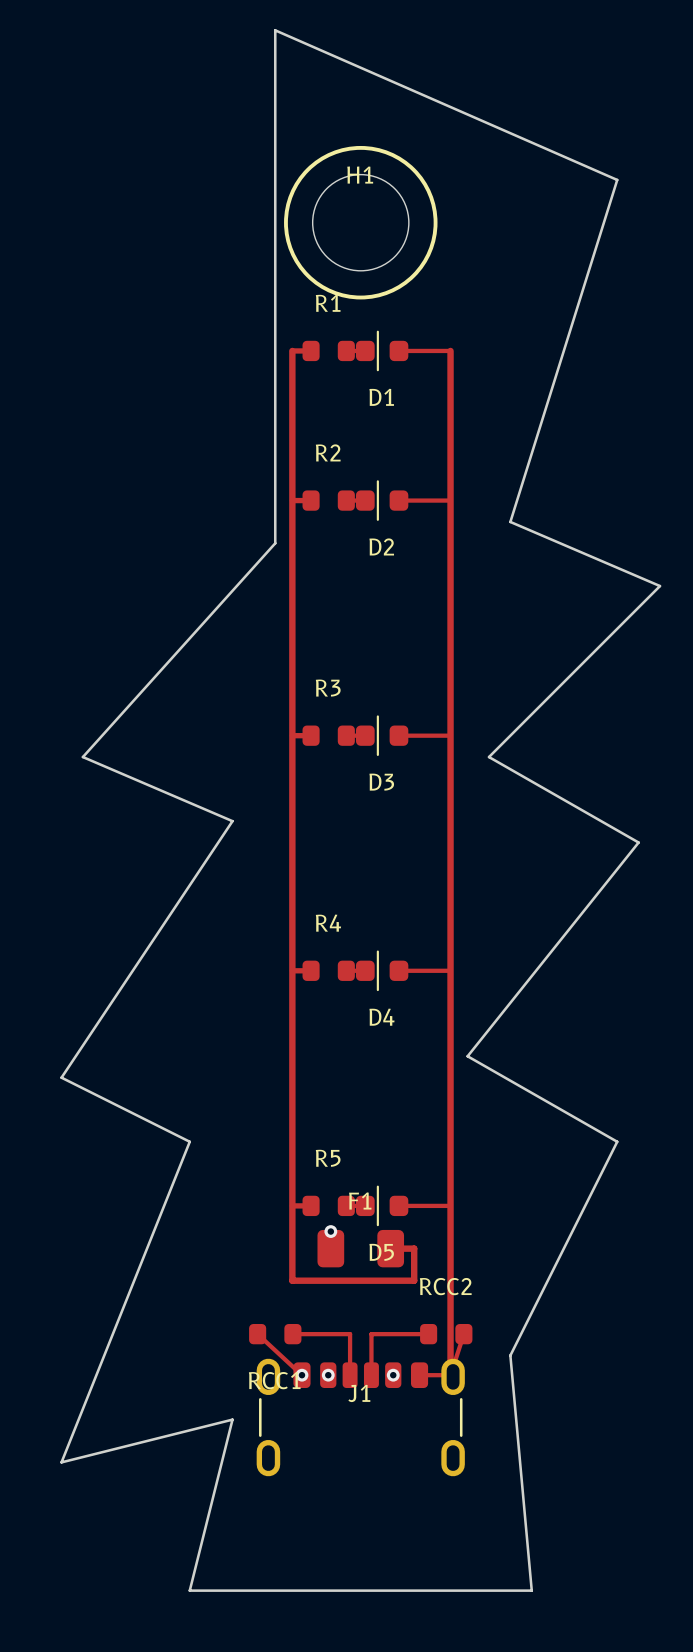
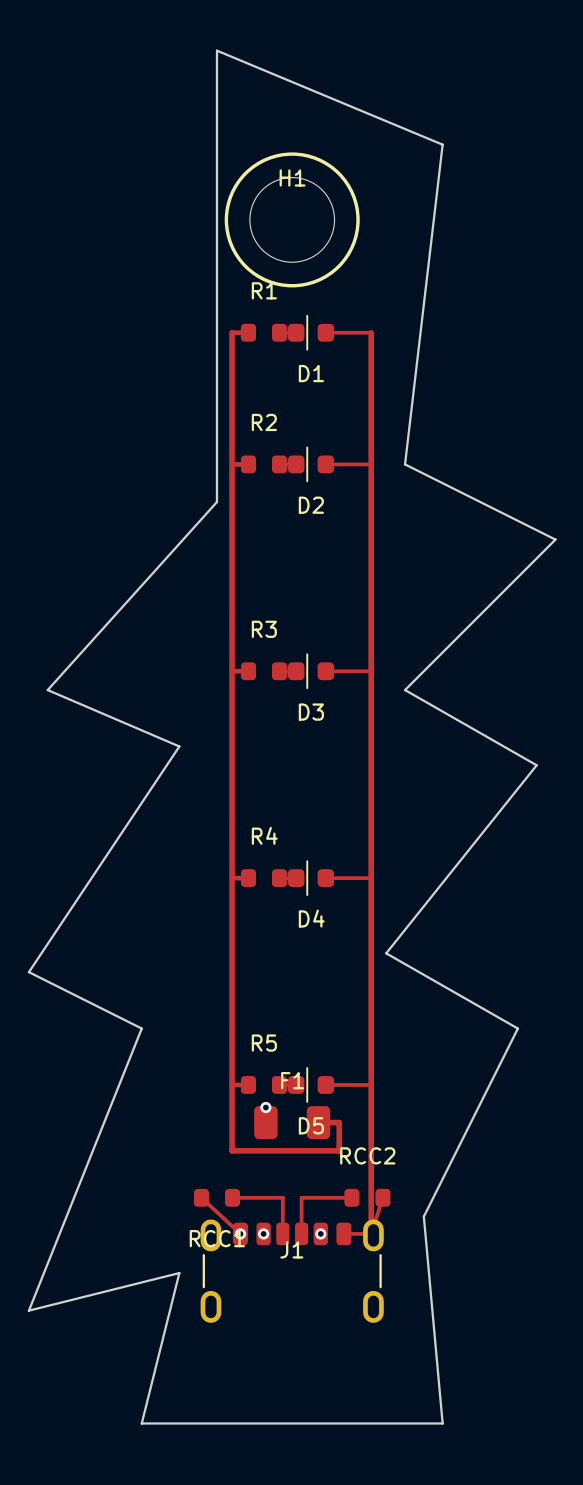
board edge: (275, 30) (617, 179) (510, 521) (659, 586) -> (216, 50) (442, 144) (405, 464) (555, 539)

